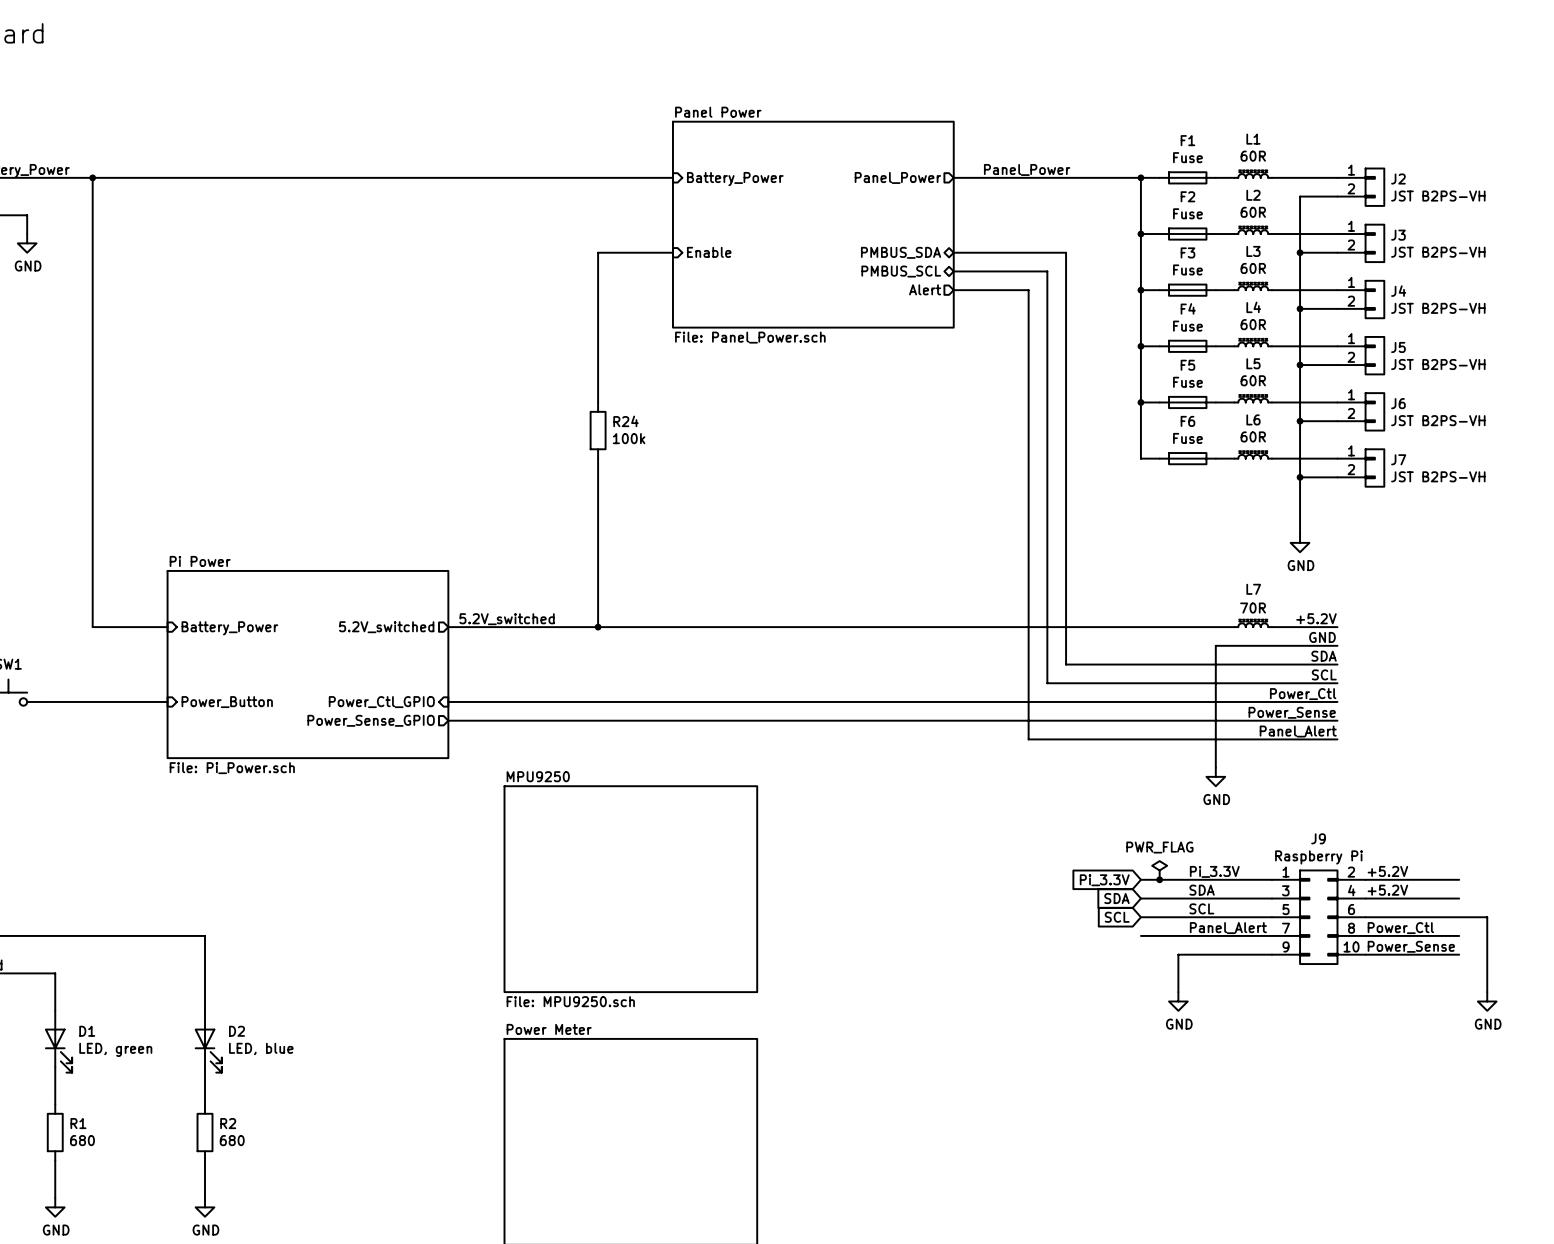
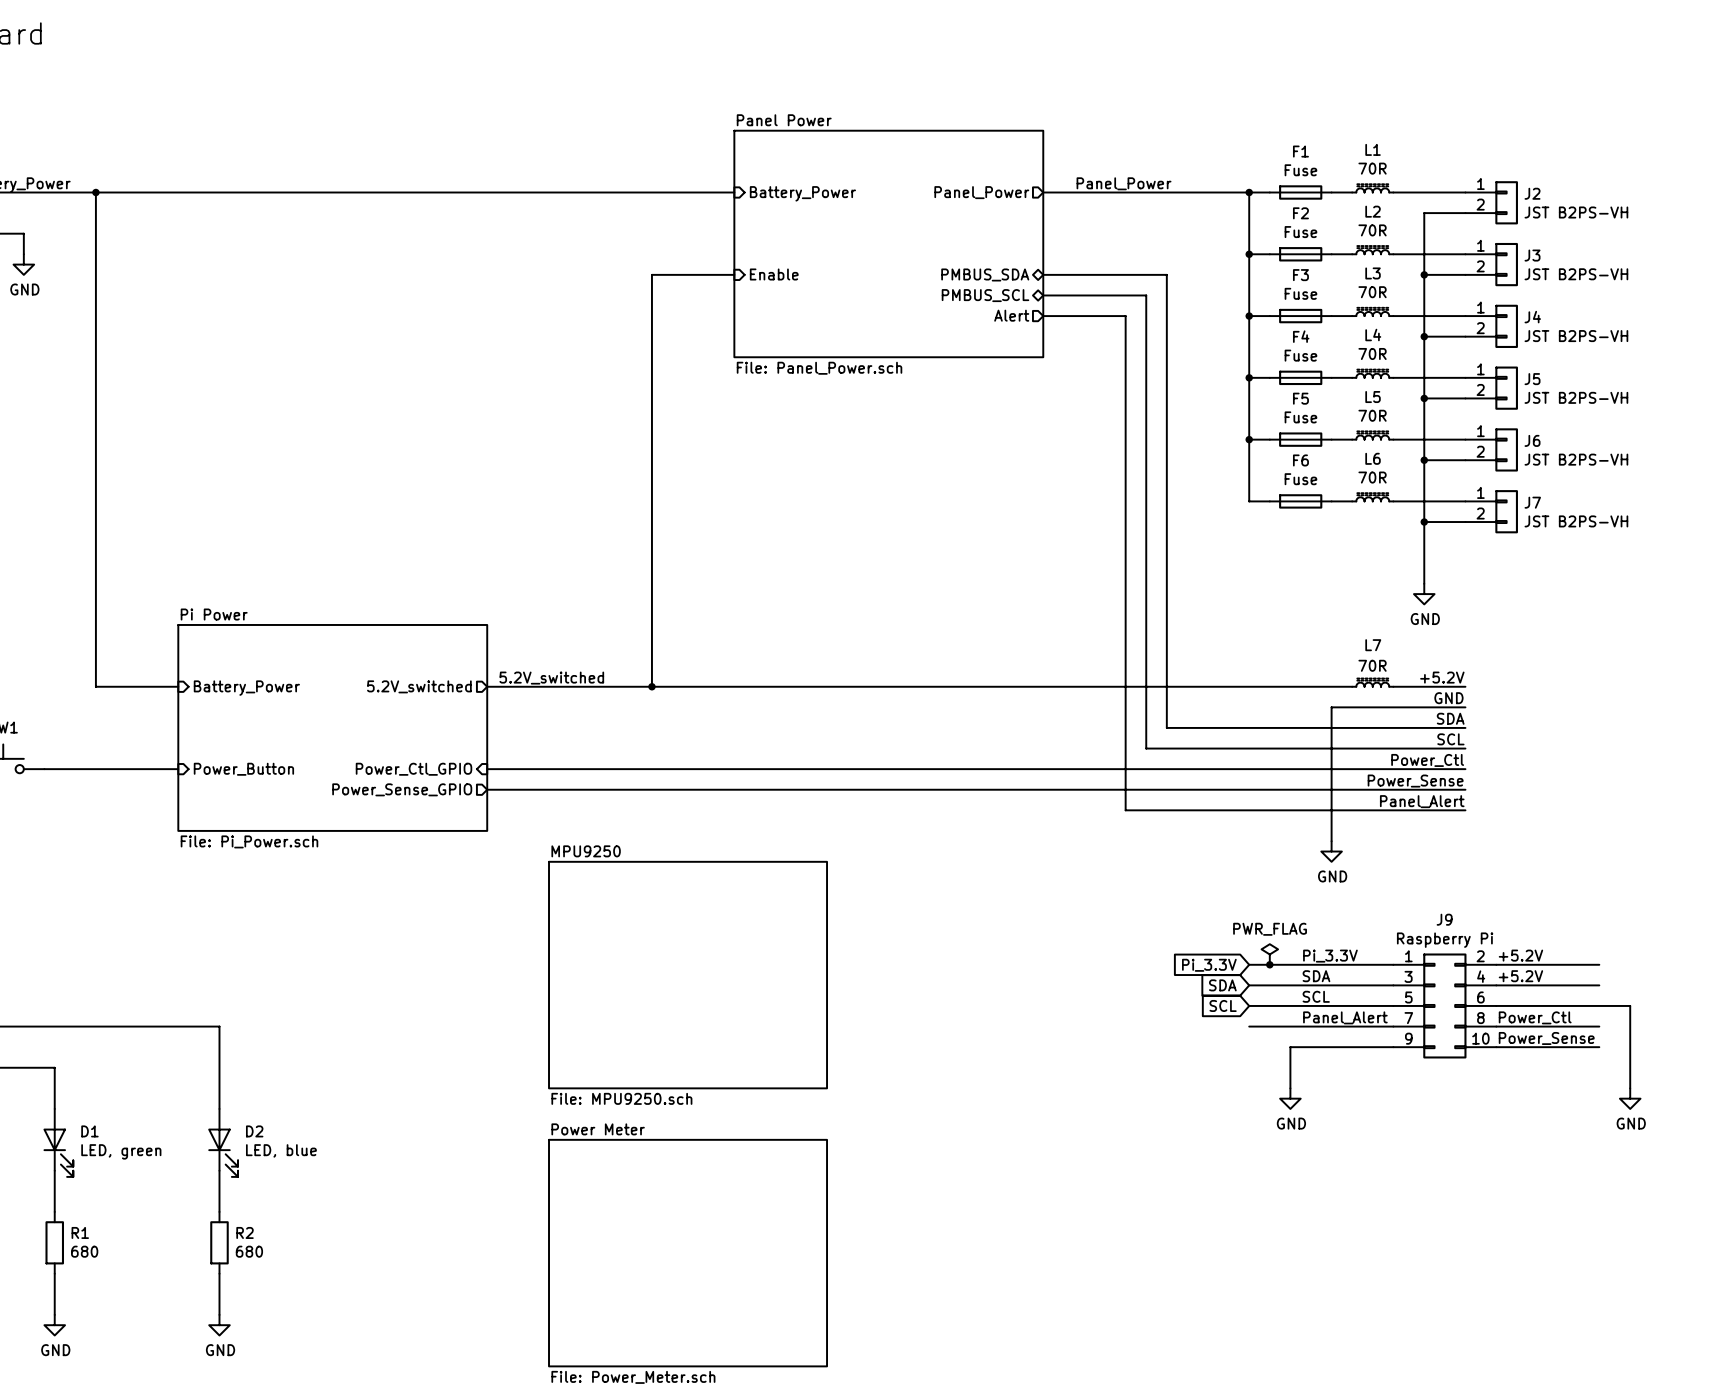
L1 value: 60R (1253, 156) -> 70R (1372, 168)
L2 value: 60R (1253, 212) -> 70R (1372, 230)
L3 value: 60R (1253, 268) -> 70R (1372, 292)
L4 value: 60R (1253, 324) -> 70R (1372, 353)
L5 value: 60R (1253, 380) -> 70R (1372, 415)
wire: none -> (651, 439) (651, 501)
R24: 100k (598, 430) -> none
L6 value: 60R (1253, 436) -> 70R (1372, 477)

